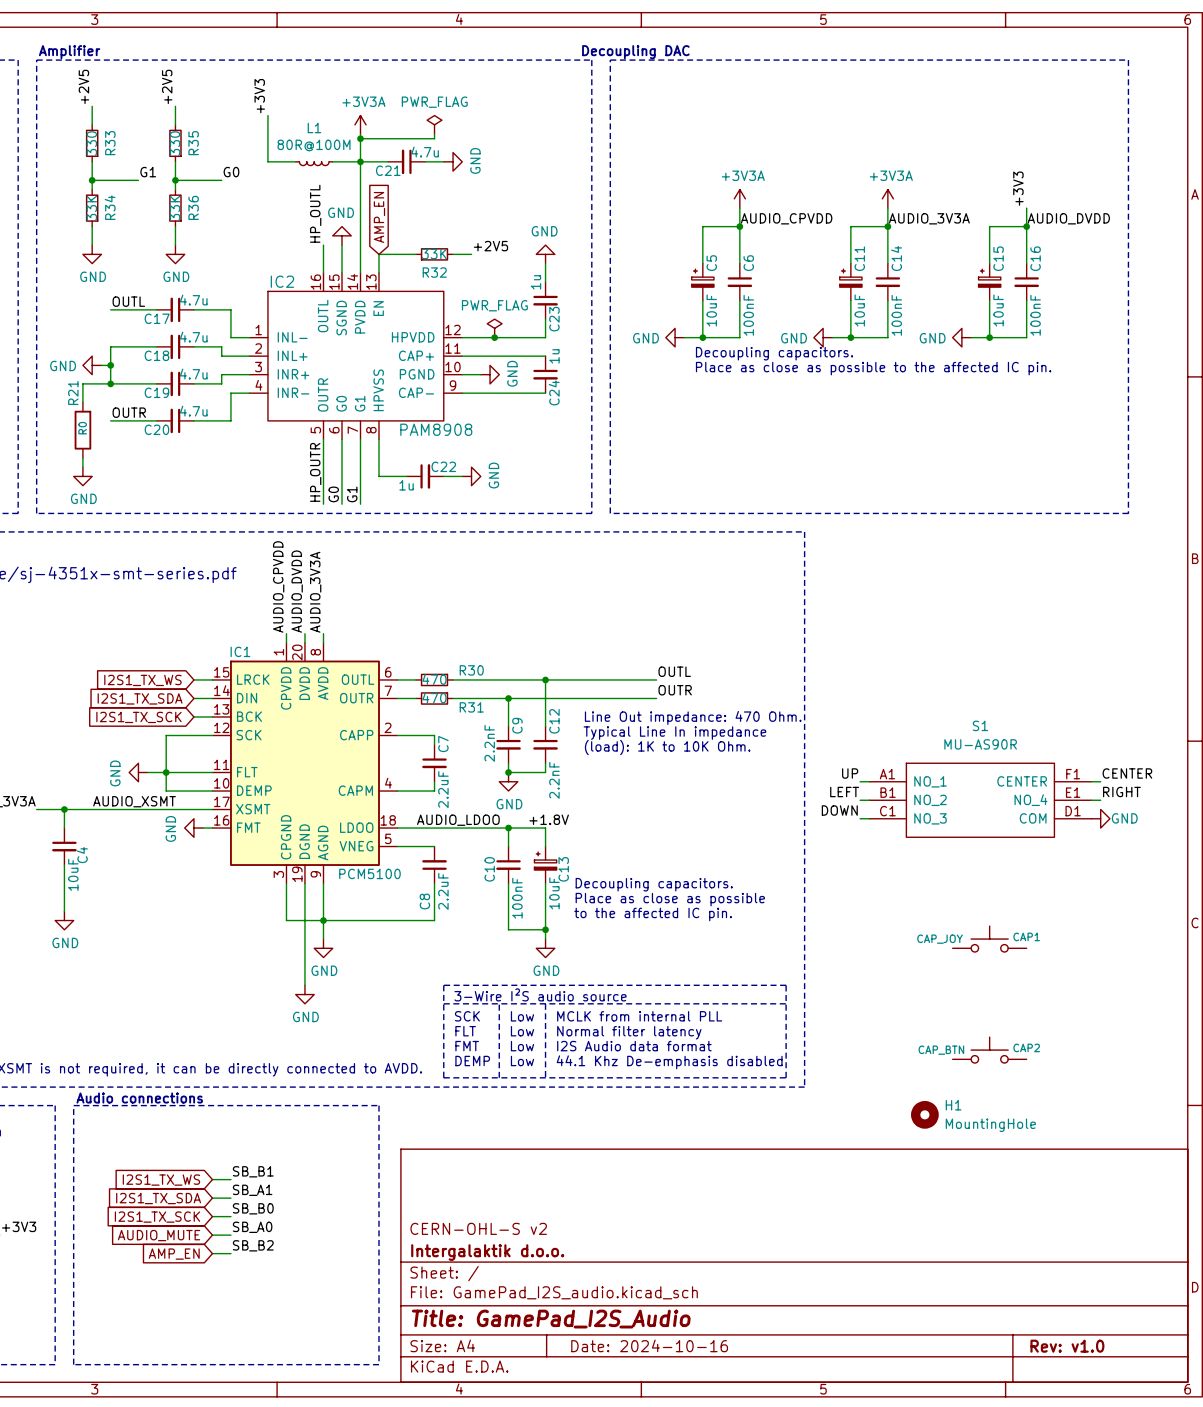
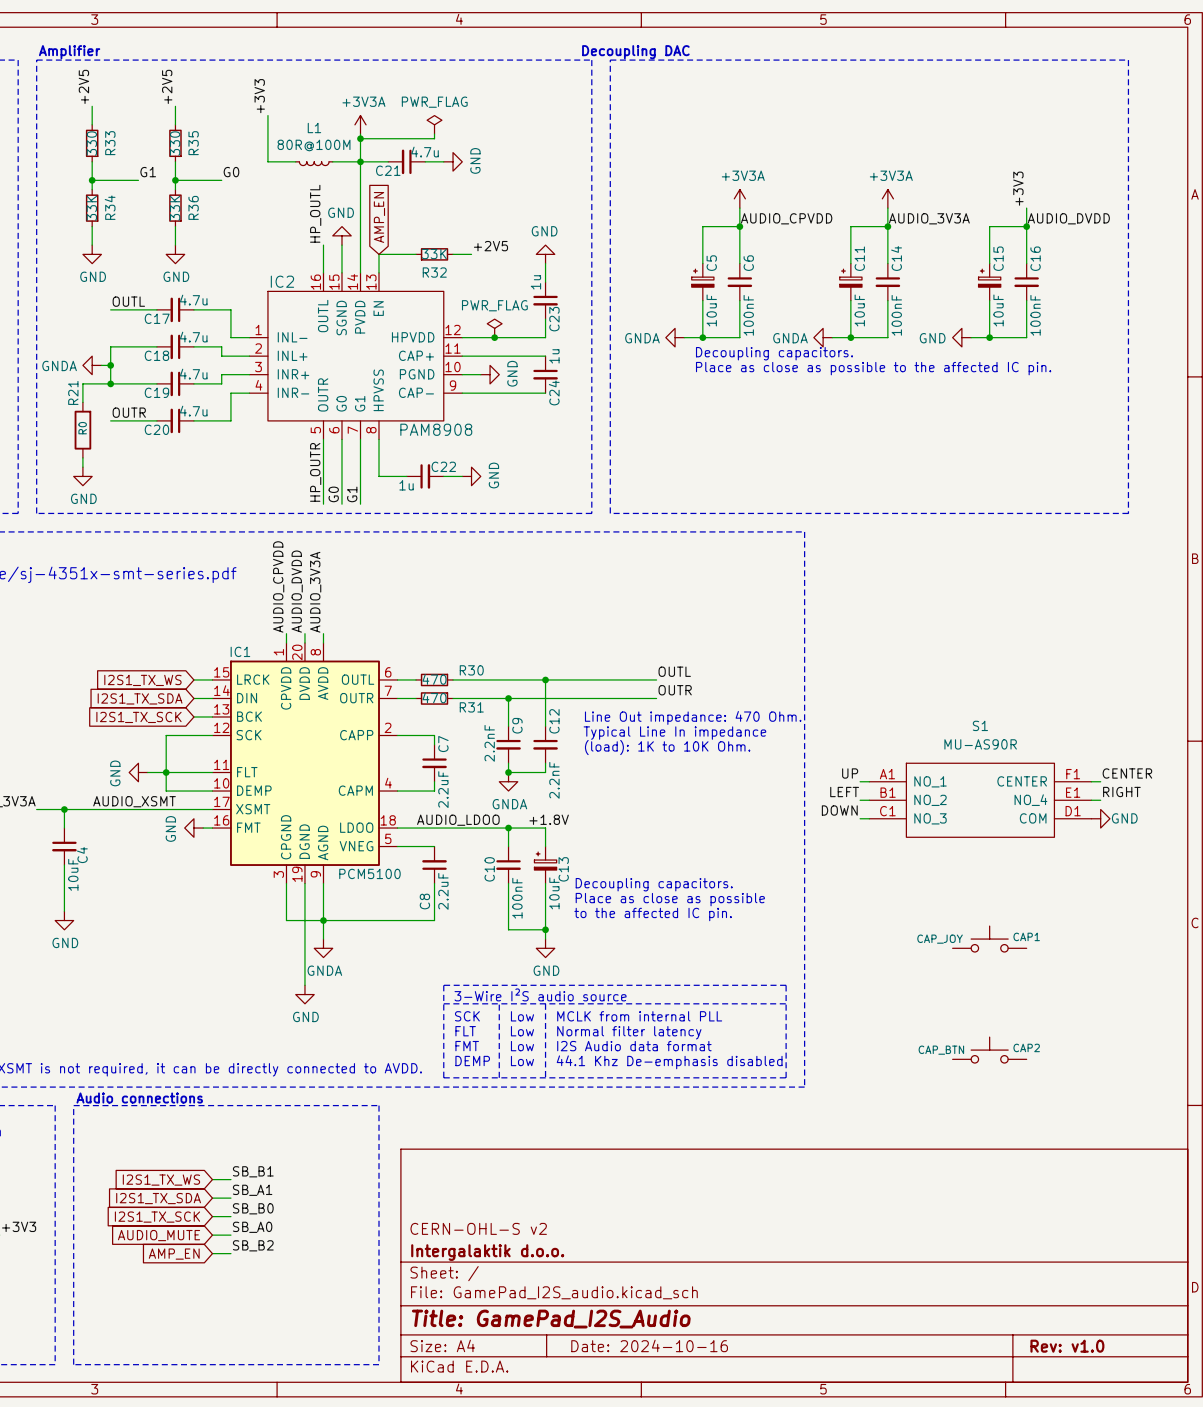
power symbol: GND (675, 337) -> GNDA (675, 337)
power symbol: GND (823, 337) -> GNDA (823, 337)
power symbol: GND (92, 365) -> GNDA (92, 365)
power symbol: GND (508, 781) -> GNDA (508, 781)
power symbol: GND (323, 948) -> GNDA (323, 948)
H1: MountingHole (924, 1114) -> none

